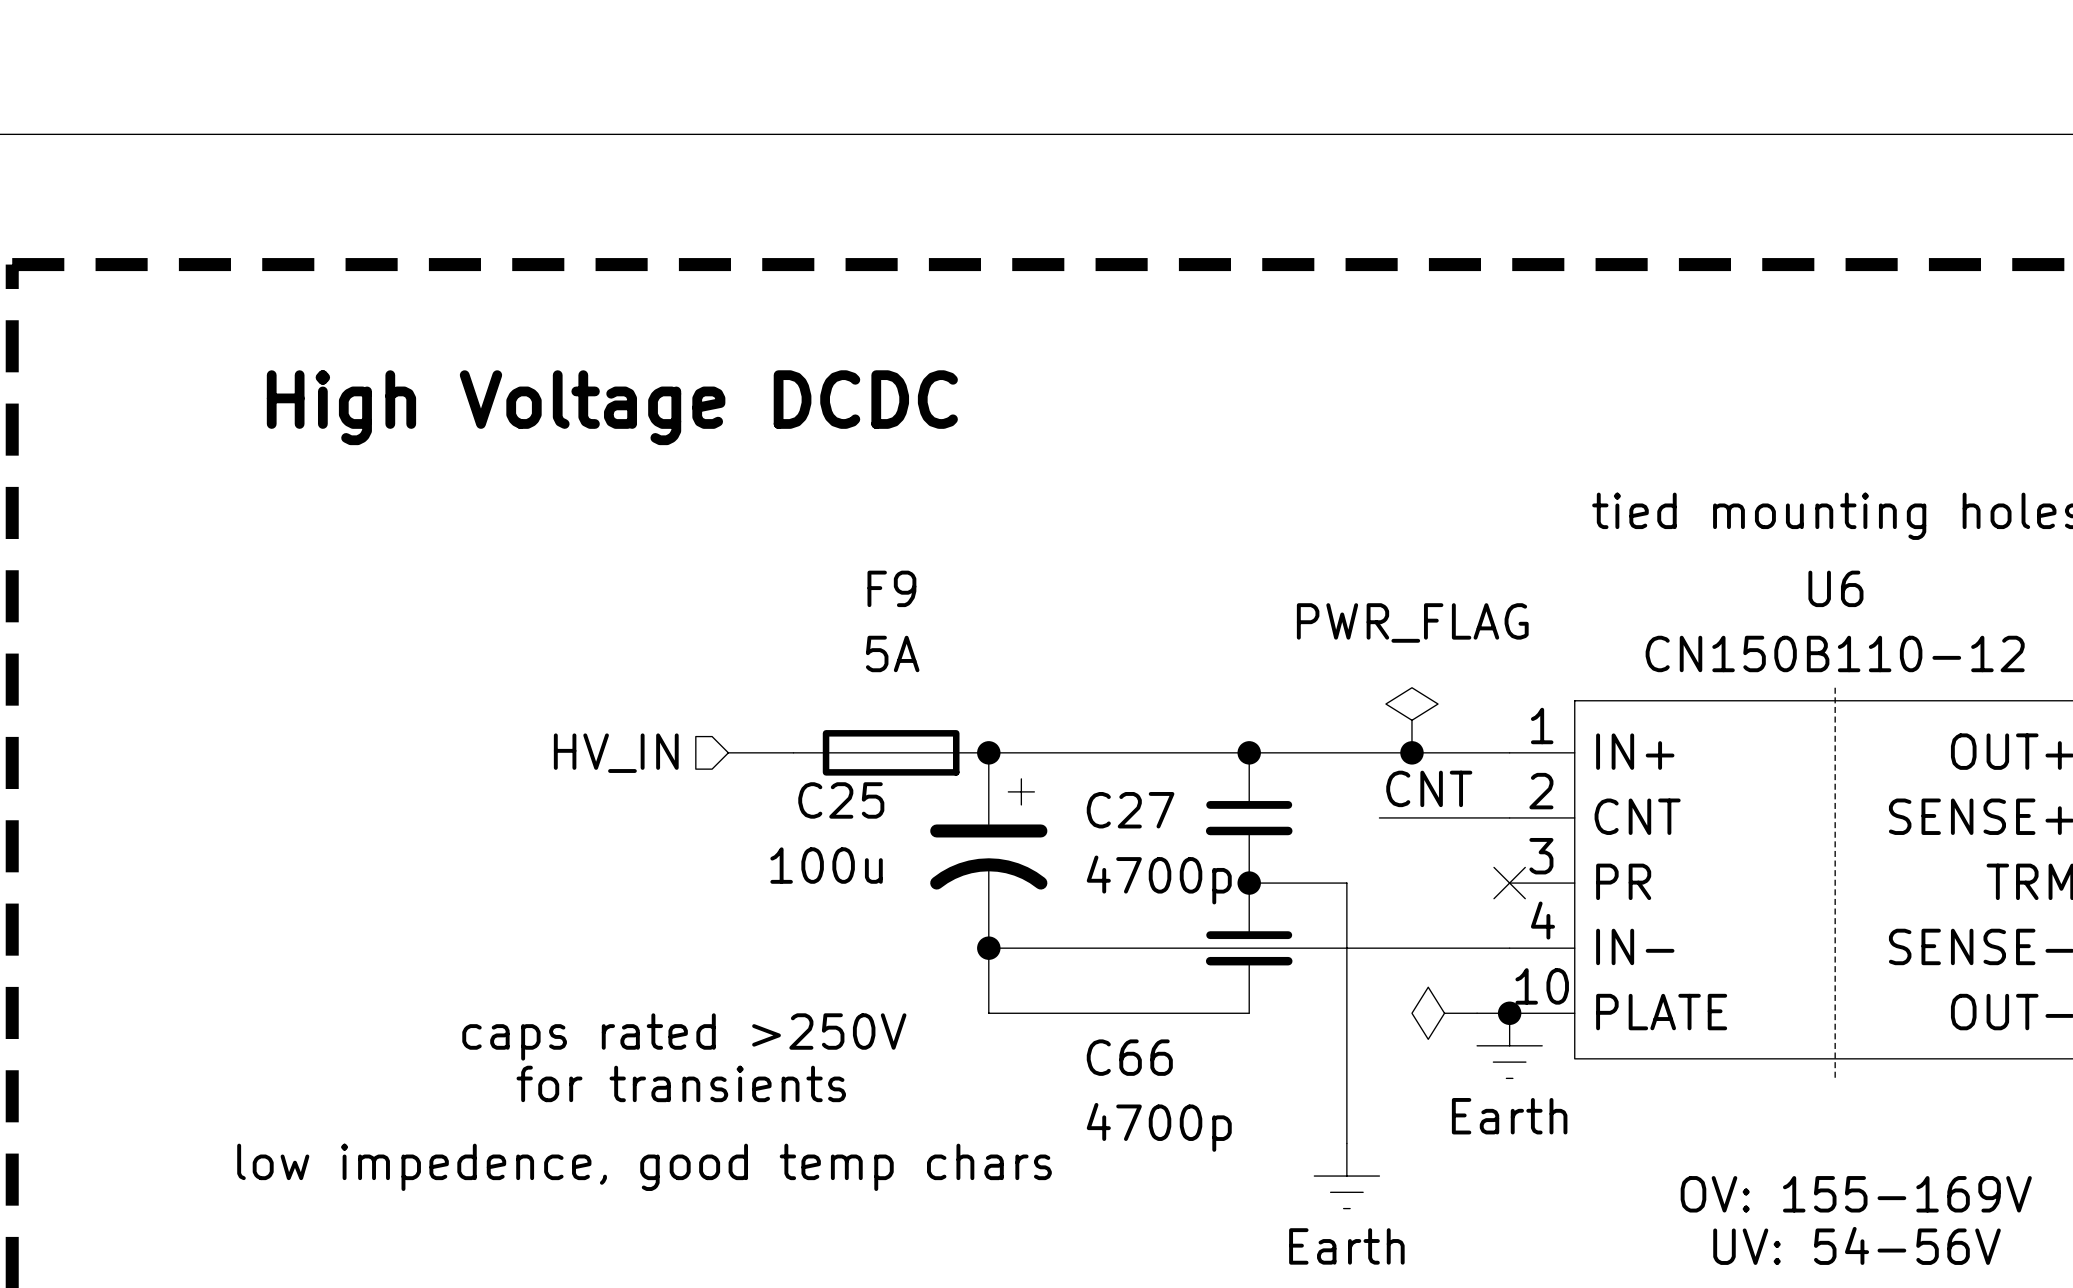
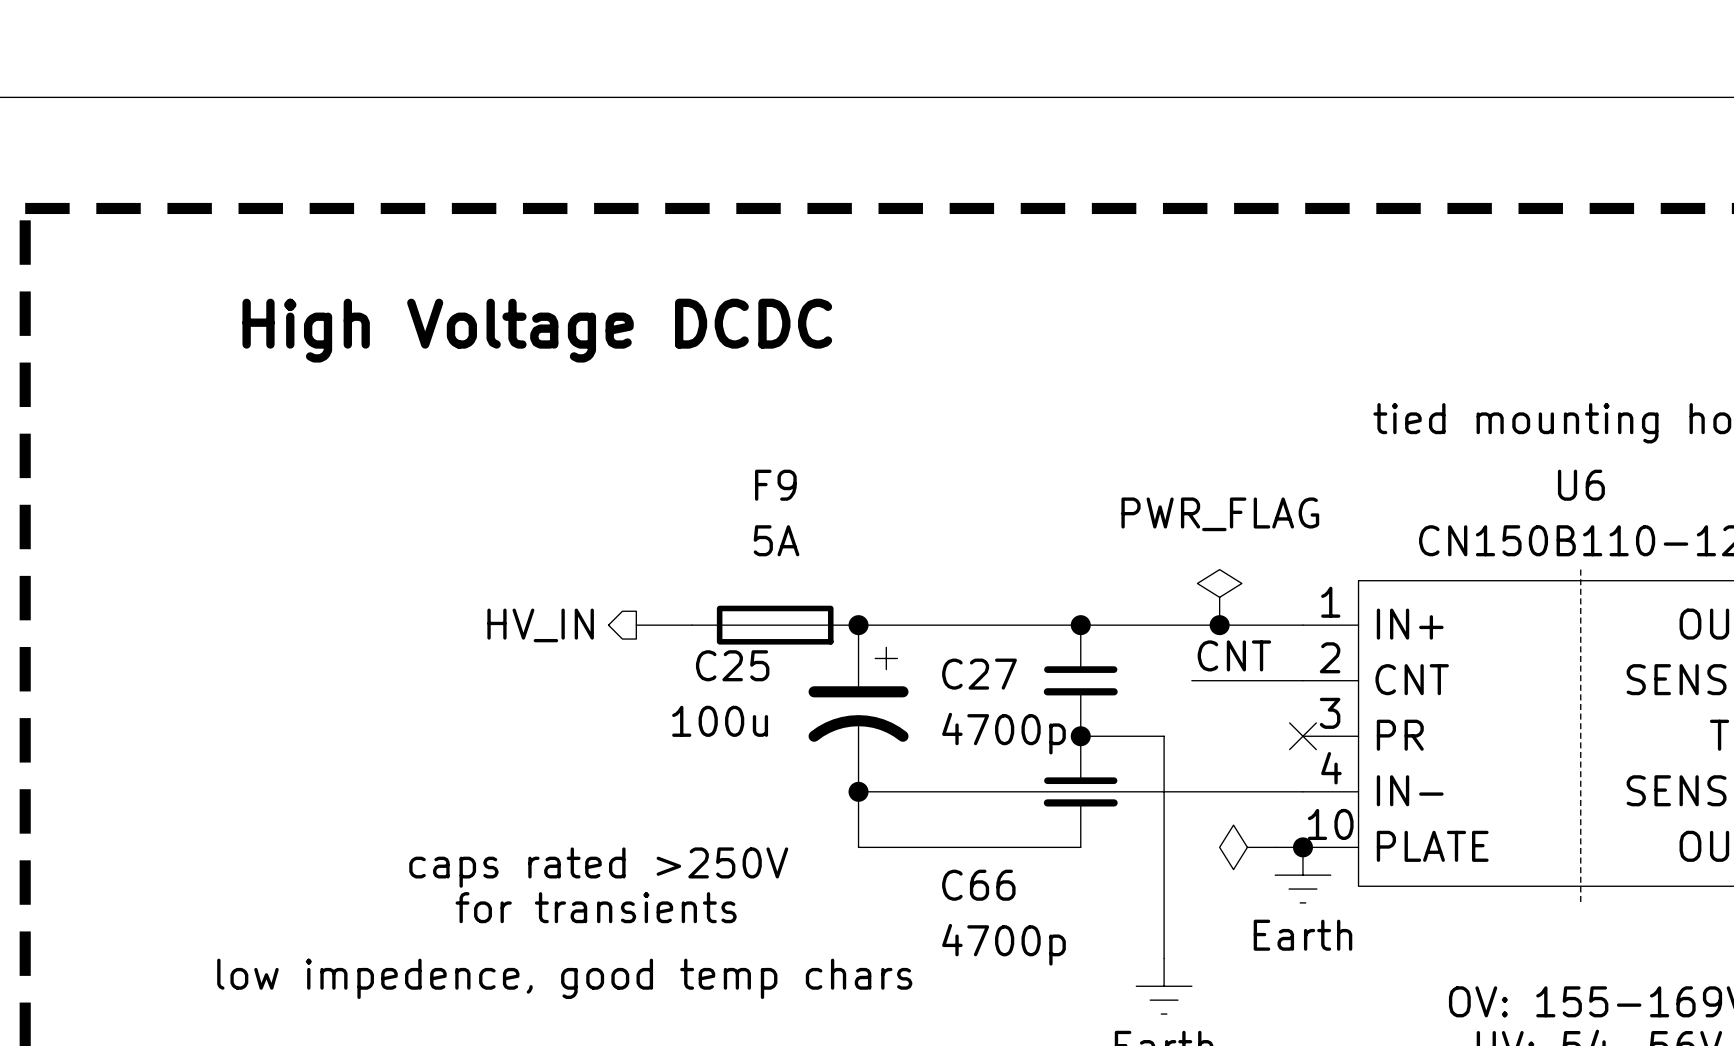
hierarchical label shape: input (616, 753) -> output (540, 625)

